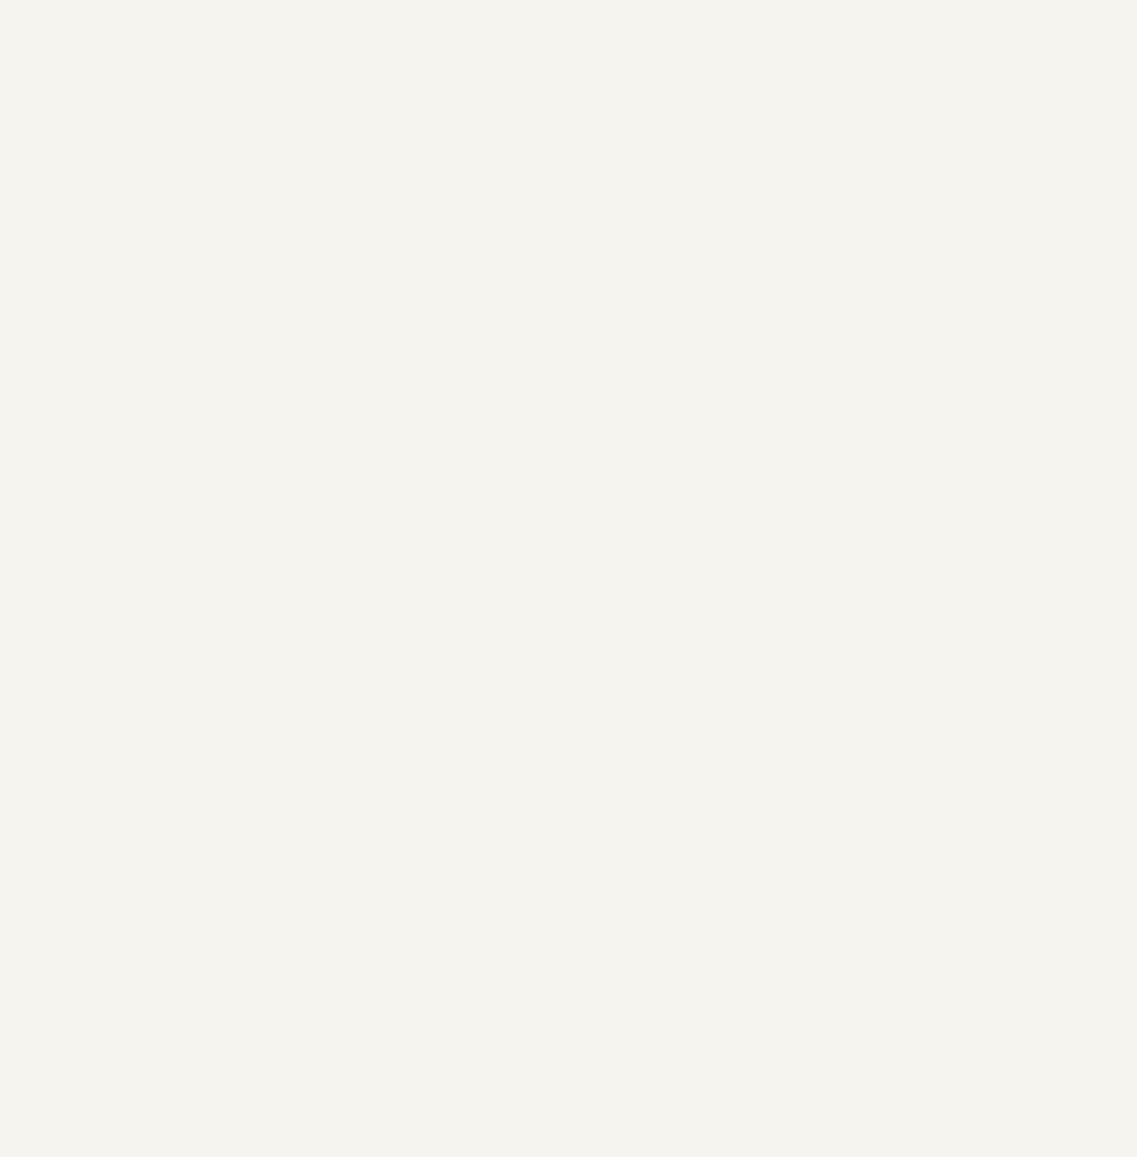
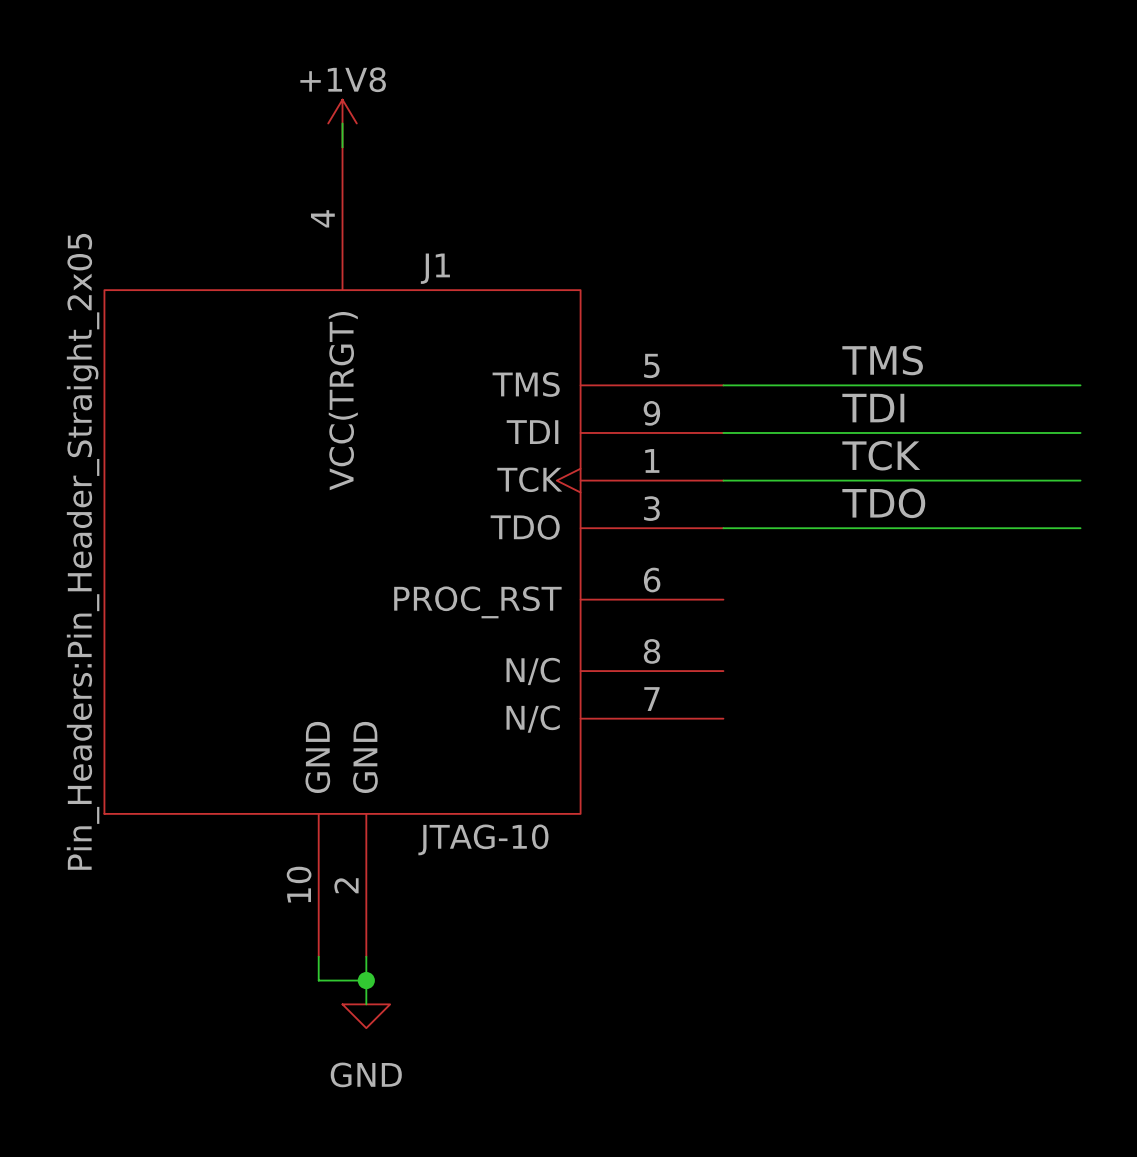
wire: none -> (342, 123) (342, 147)
power symbol: none -> +1V8 (342, 123)
label: none -> TMS (882, 360)
wire: none -> (723, 385) (1080, 385)
label: none -> TDI (873, 408)
wire: none -> (723, 432) (1080, 432)
label: none -> TCK (881, 455)
wire: none -> (723, 480) (1080, 480)
label: none -> TDO (883, 503)
wire: none -> (723, 528) (1080, 528)
J1: none -> JTAG-10 (413, 552)
wire: none -> (318, 956) (318, 980) (366, 980)
wire: none -> (366, 956) (366, 1004)
junction: none -> (366, 980)
power symbol: none -> GND (366, 1016)

